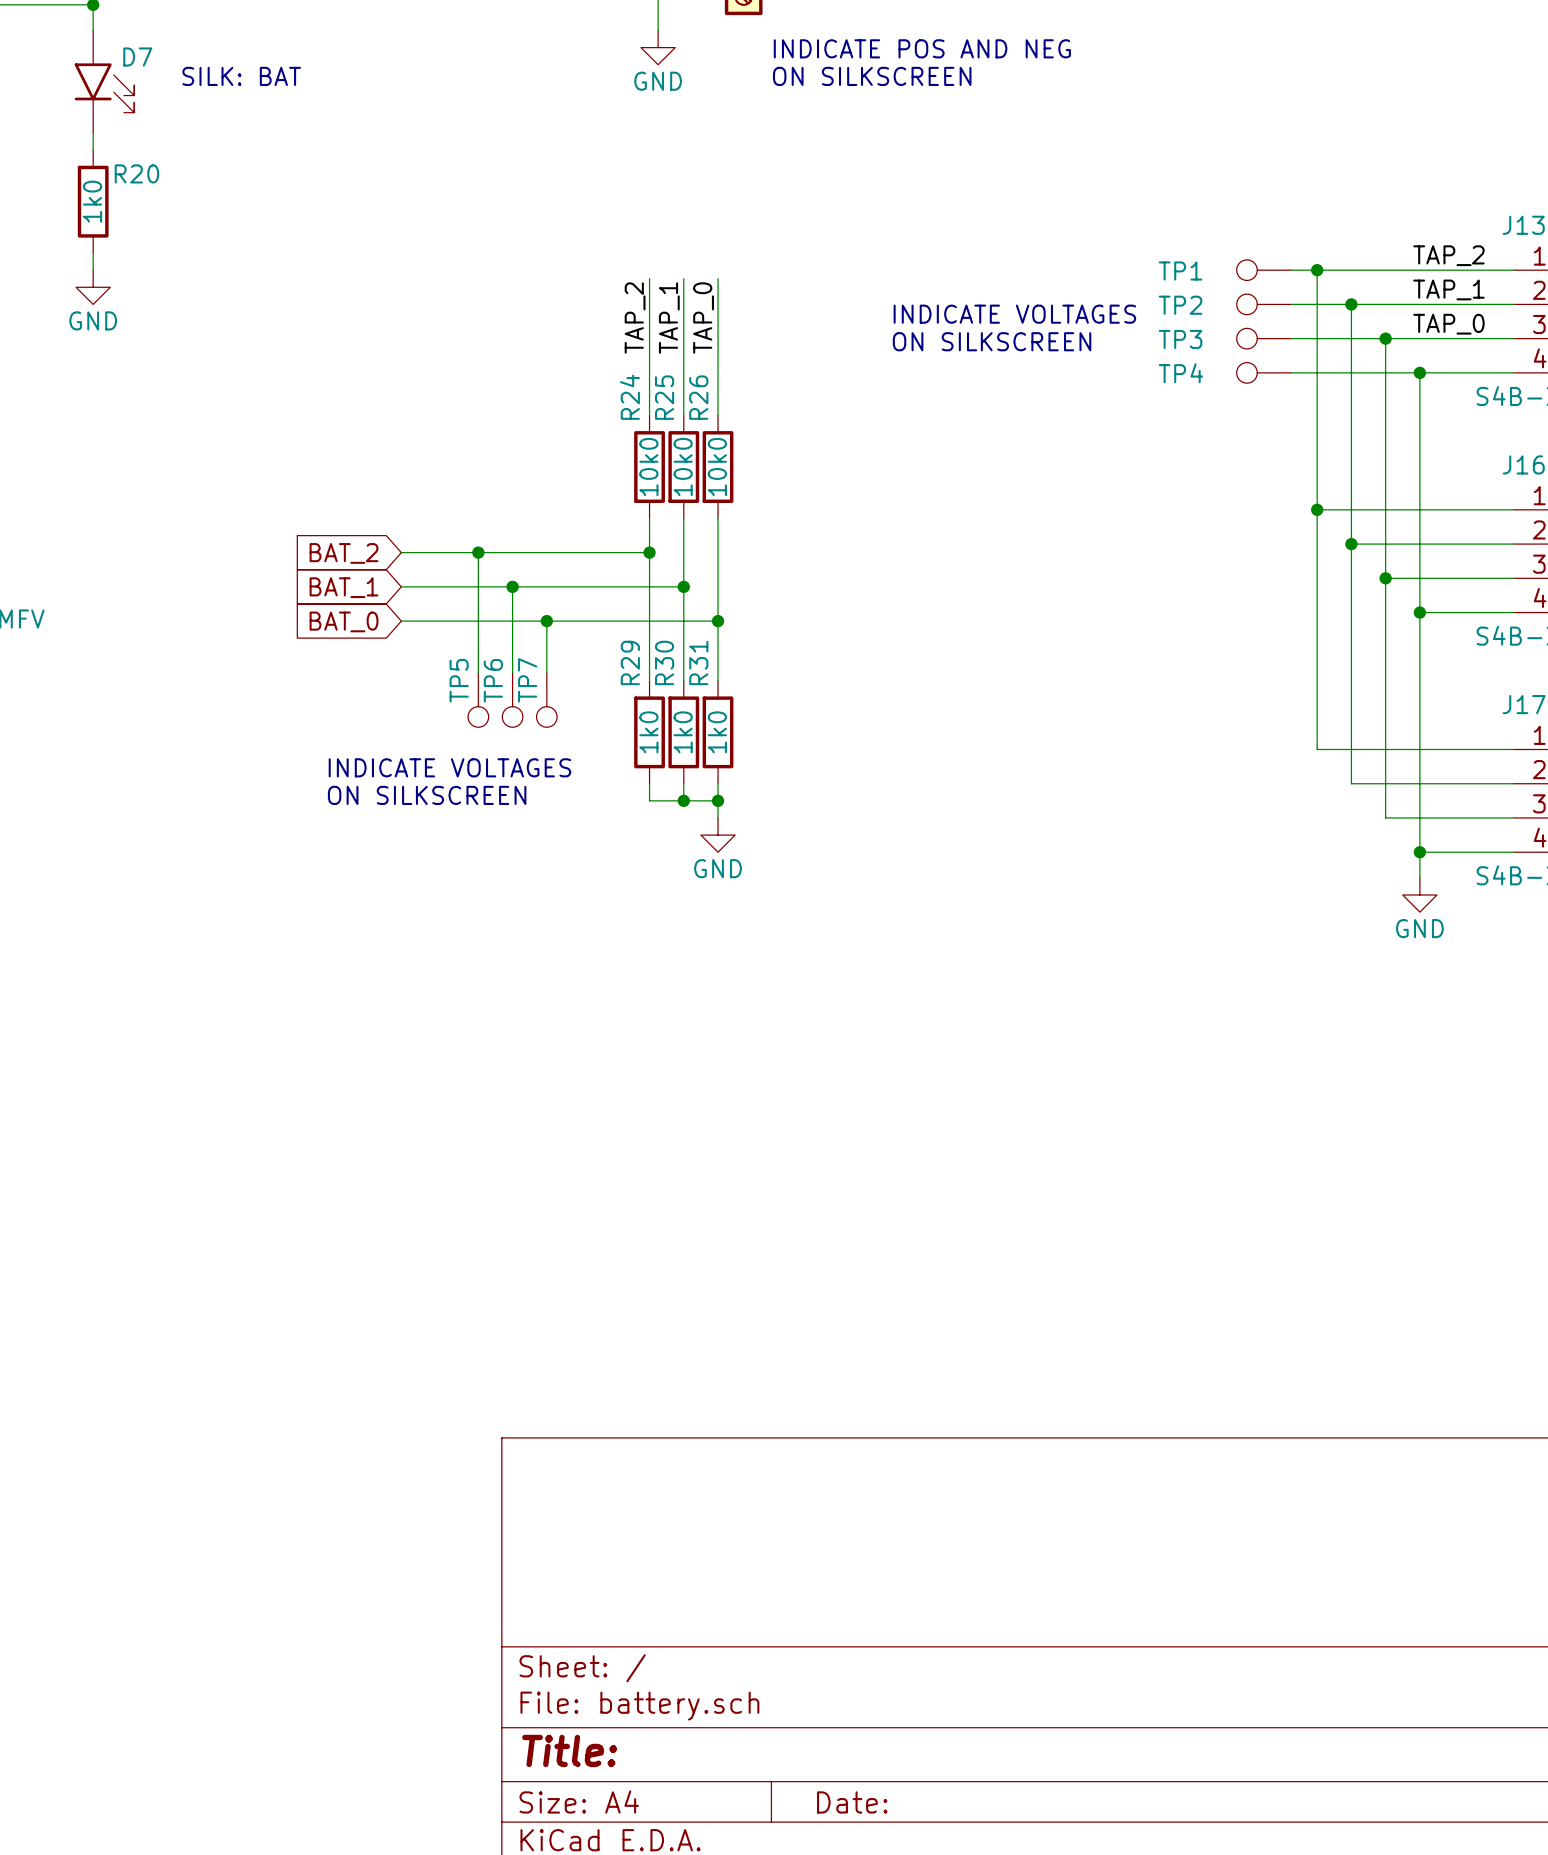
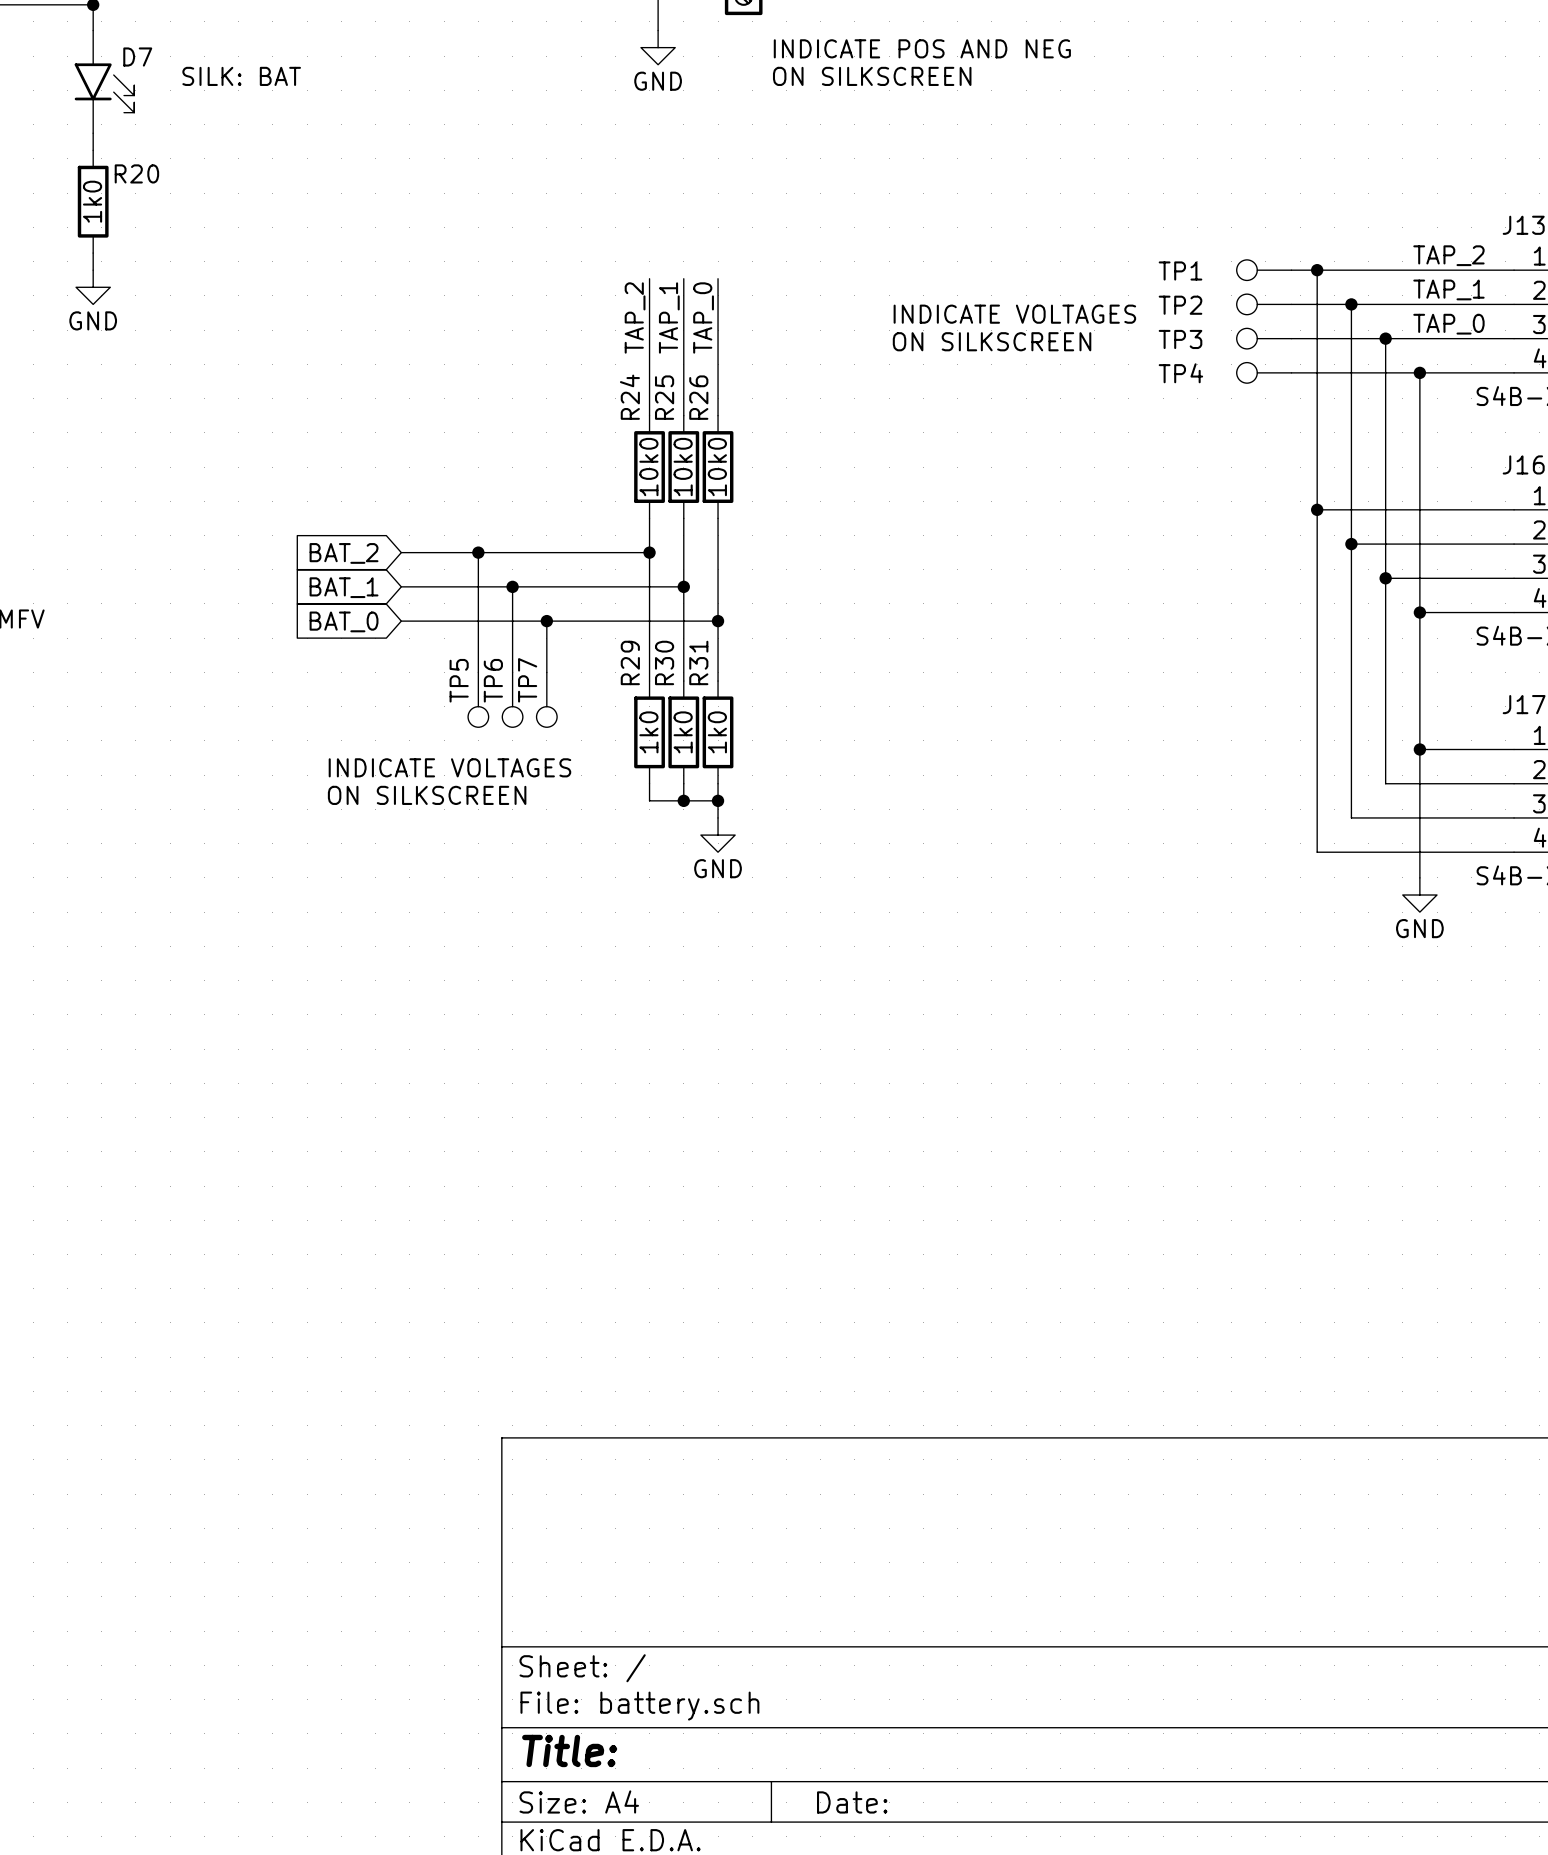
wire: (1317, 749) (1419, 749) -> (1317, 749) (1317, 852) (1419, 852)
junction: none -> (1419, 749)
wire: (1351, 783) (1385, 783) (1385, 817) -> (1351, 783) (1351, 817) (1385, 817)
junction: (1419, 852) -> none

